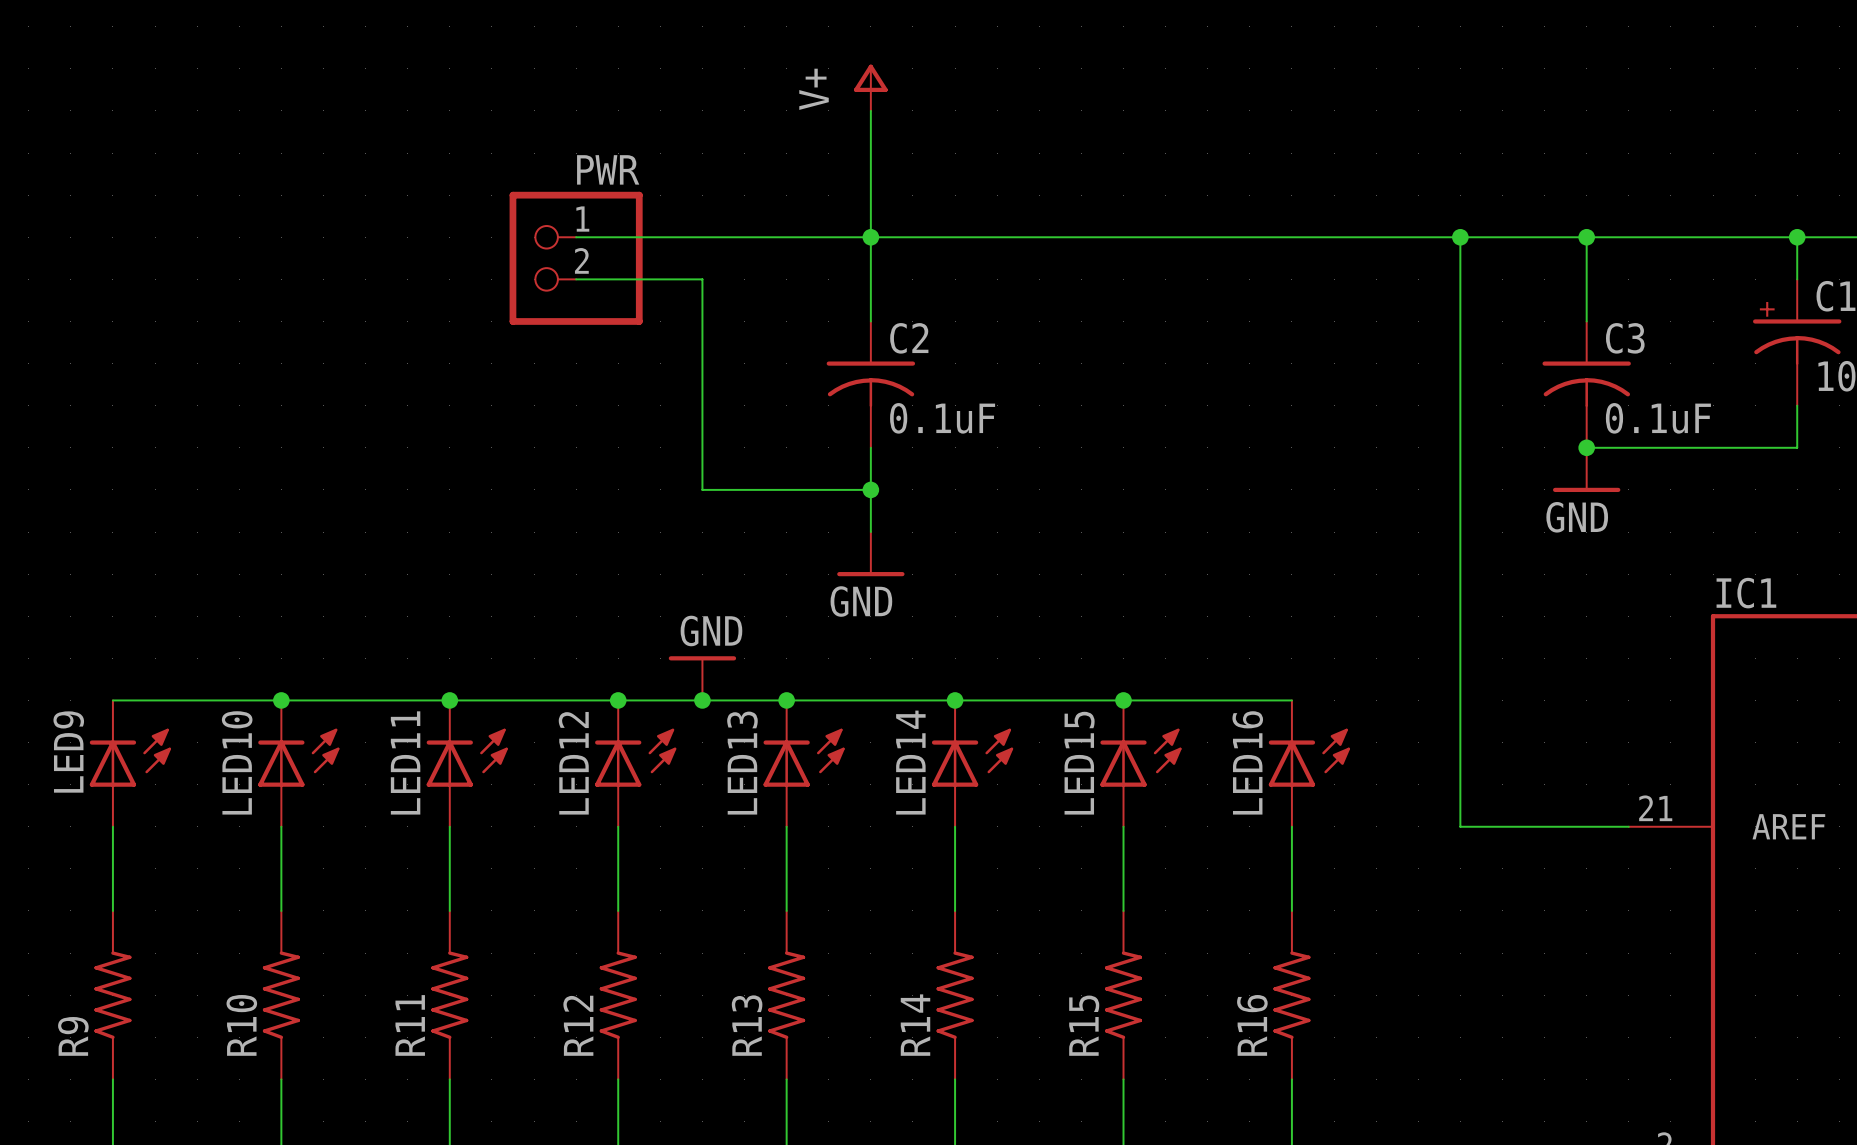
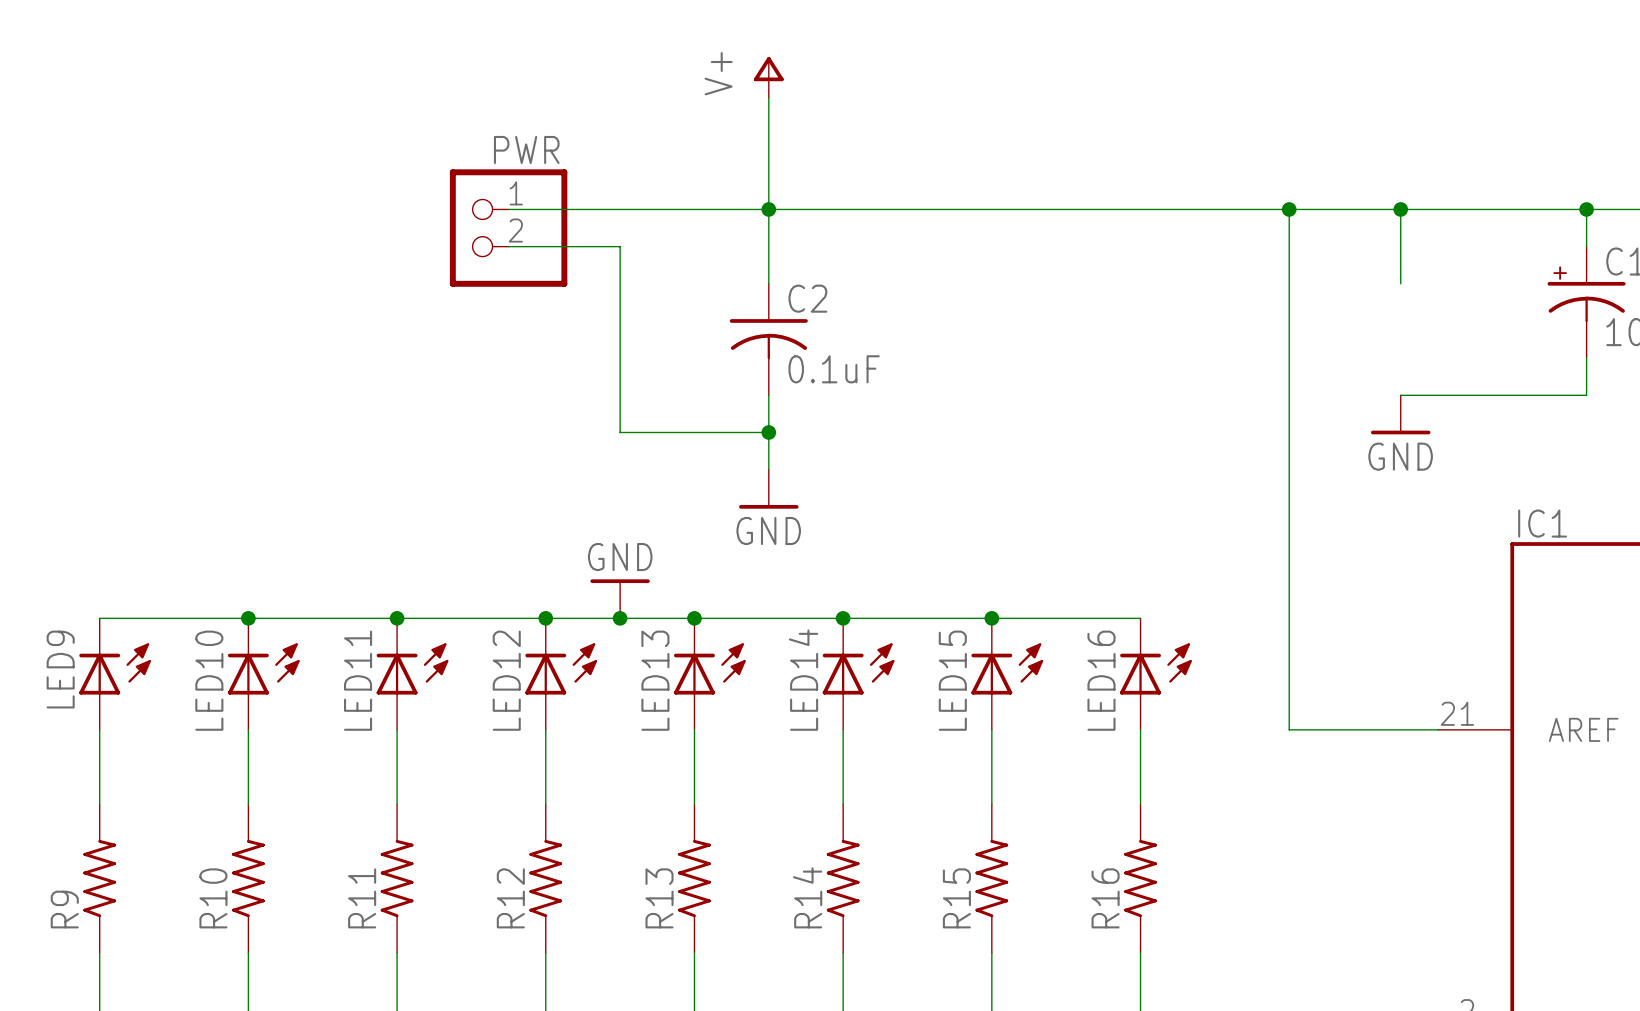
C3: 0.1uF (1586, 384) -> none
junction: (1586, 447) -> none

